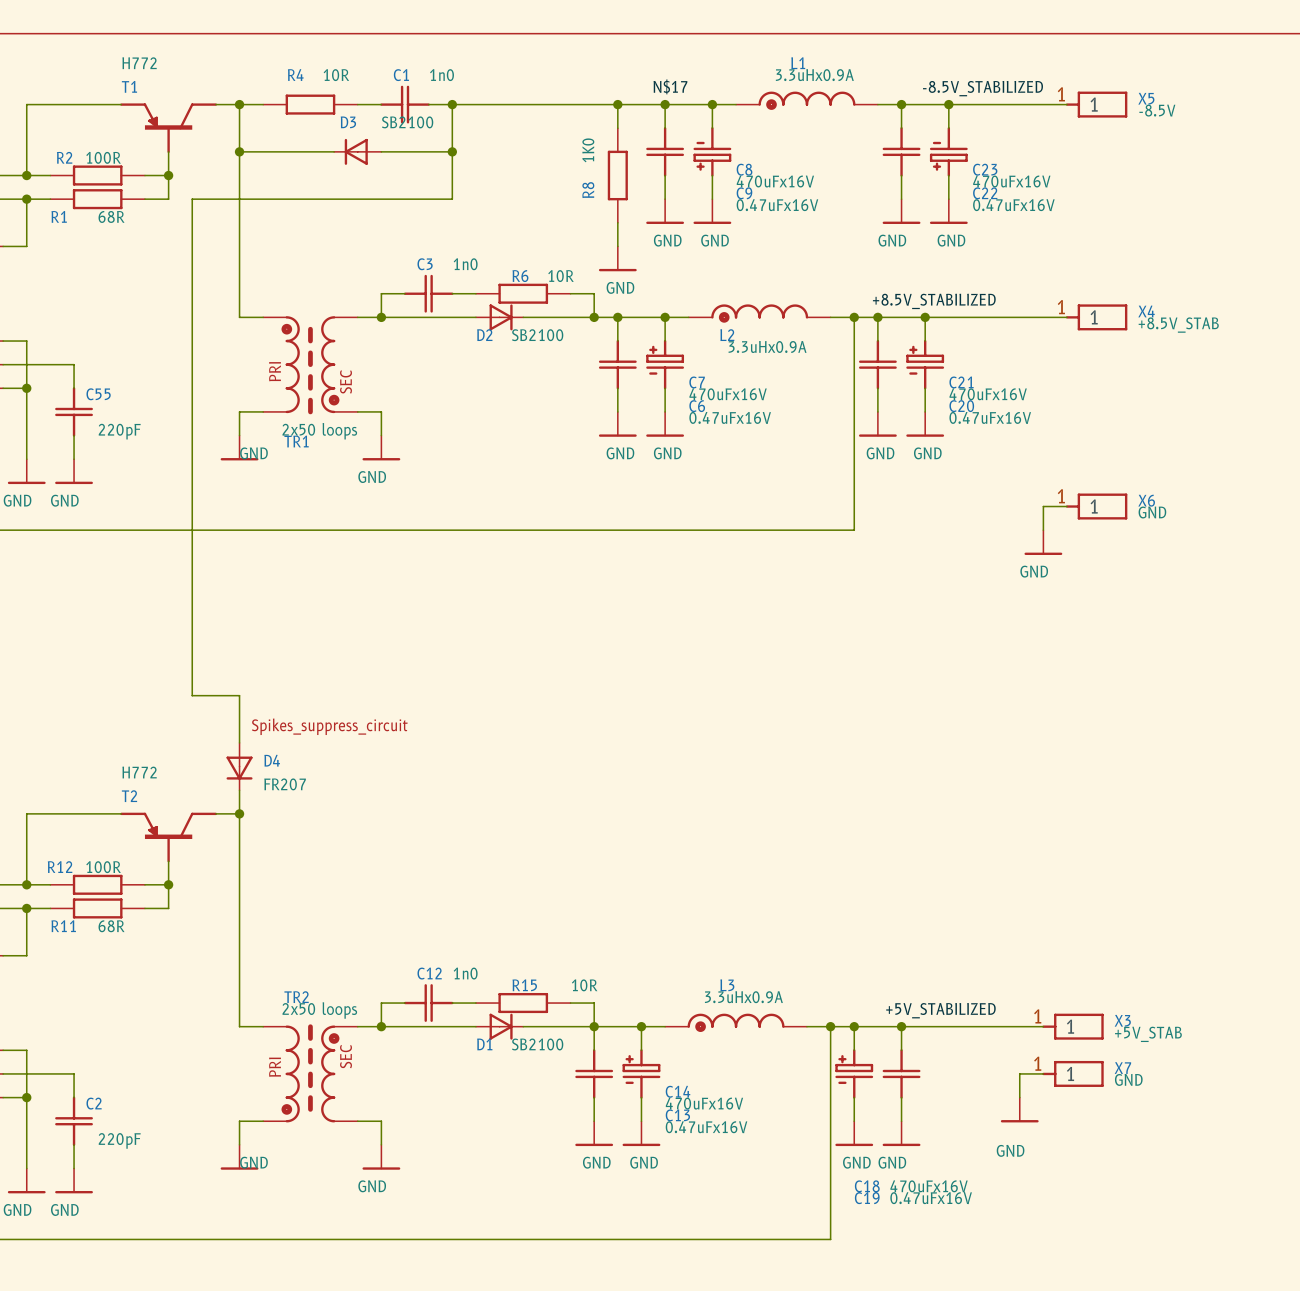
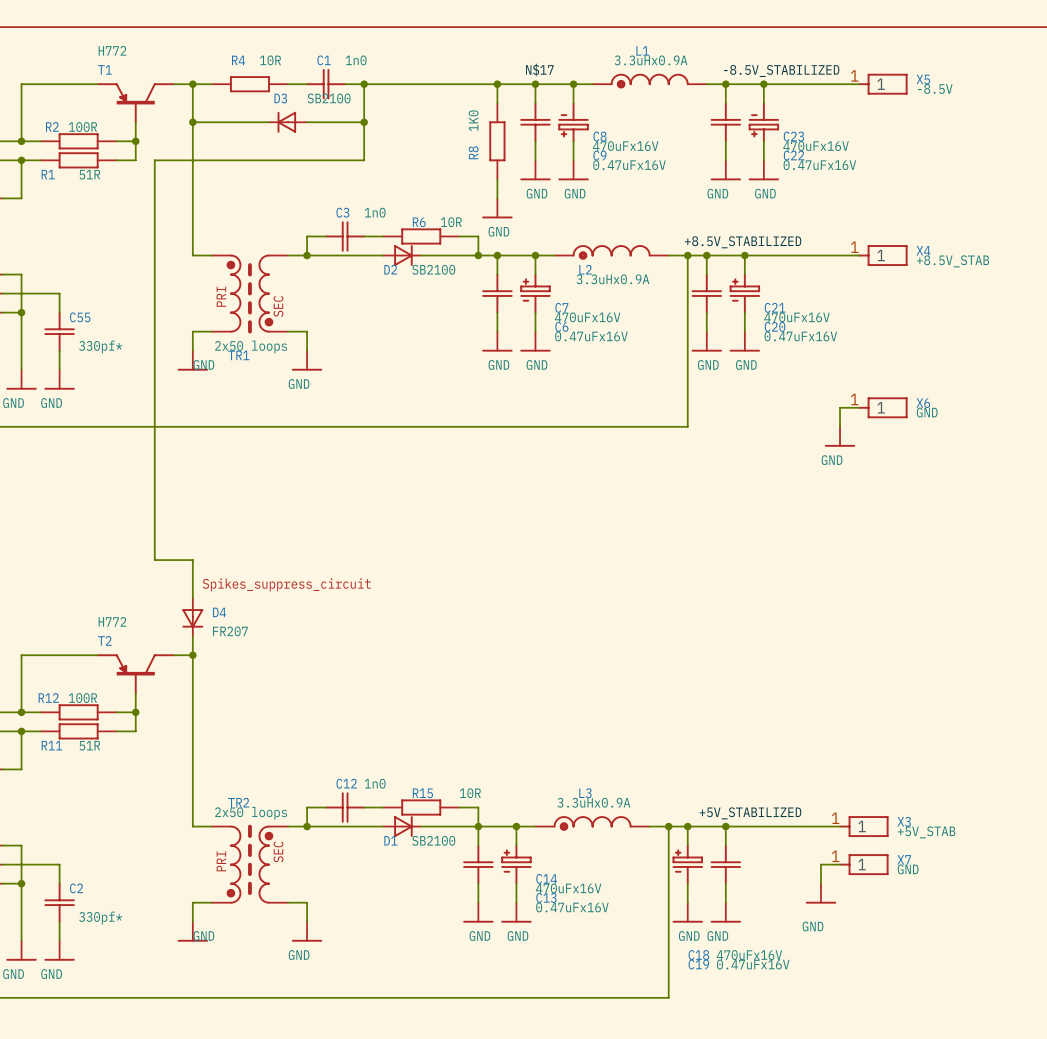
R1 value: 68R (111, 216) -> 51R (89, 174)
C55 value: 220pF (119, 431) -> 330pf* (100, 347)
R11 value: 68R (111, 926) -> 51R (89, 745)
C2 value: 220pF (119, 1140) -> 330pf* (100, 918)

